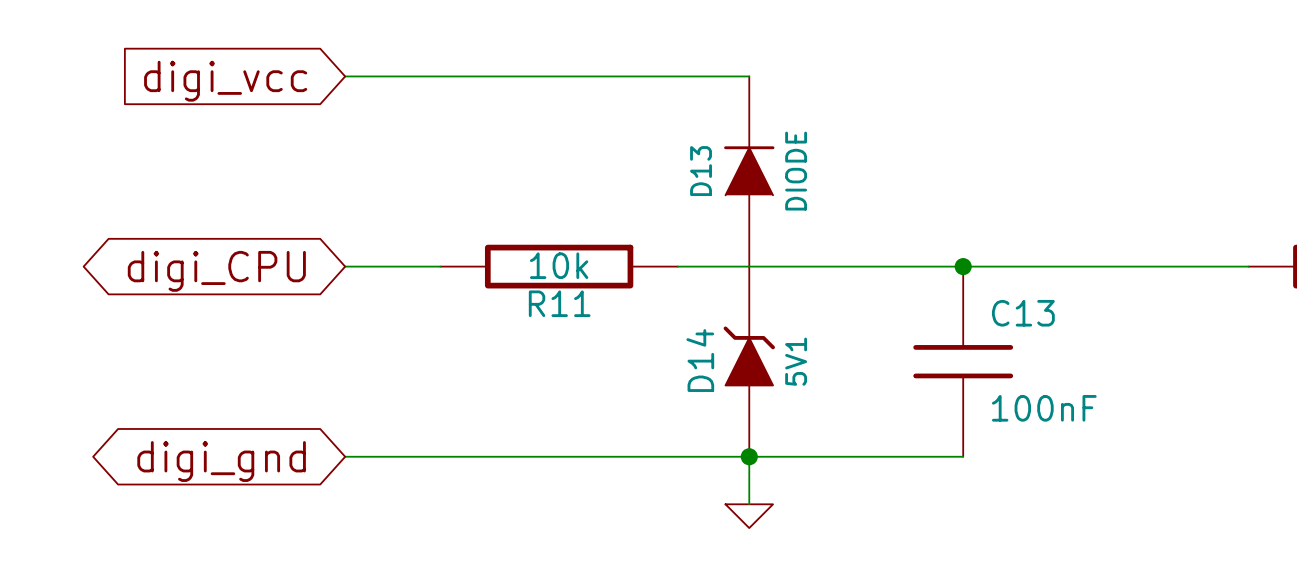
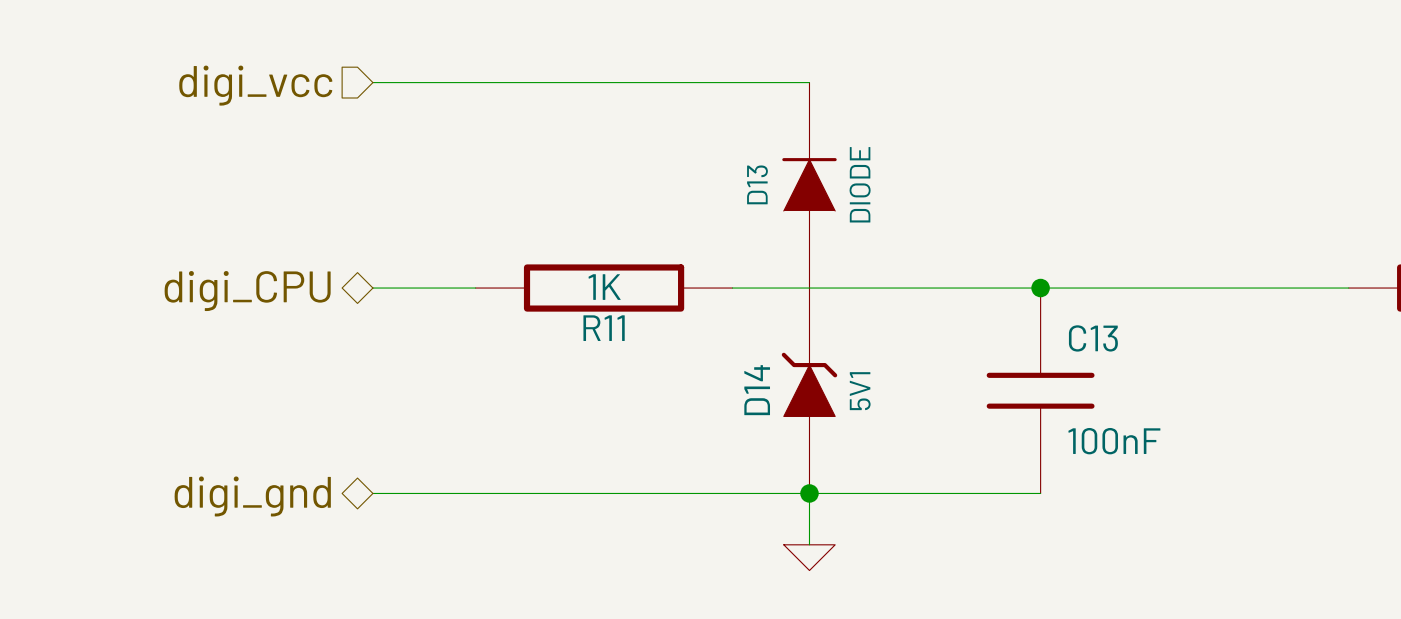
hierarchical label: none -> digi_vcc (255, 85)
global label: digi_vcc (225, 81) -> none
R11 value: 10k (559, 265) -> 1K (604, 287)
hierarchical label: none -> digi_CPU (247, 291)
global label: digi_CPU (216, 271) -> none
hierarchical label: none -> digi_gnd (252, 496)
global label: digi_gnd (221, 461) -> none

